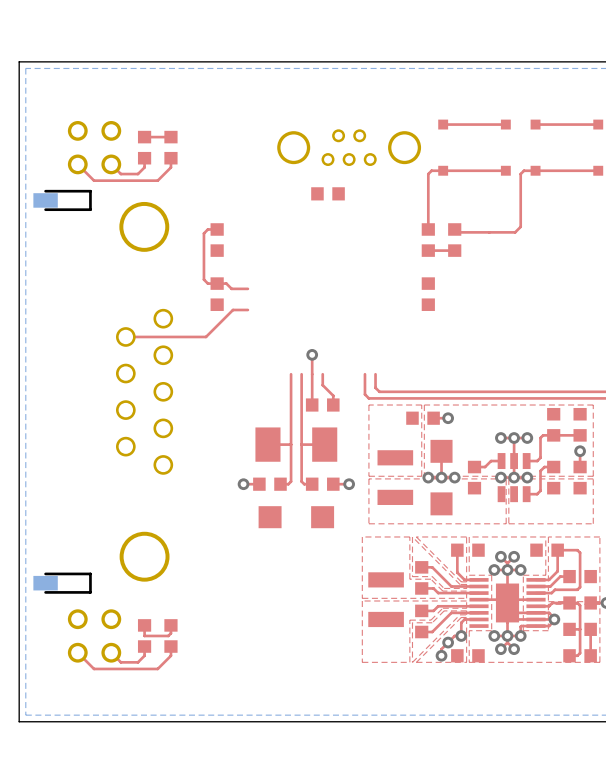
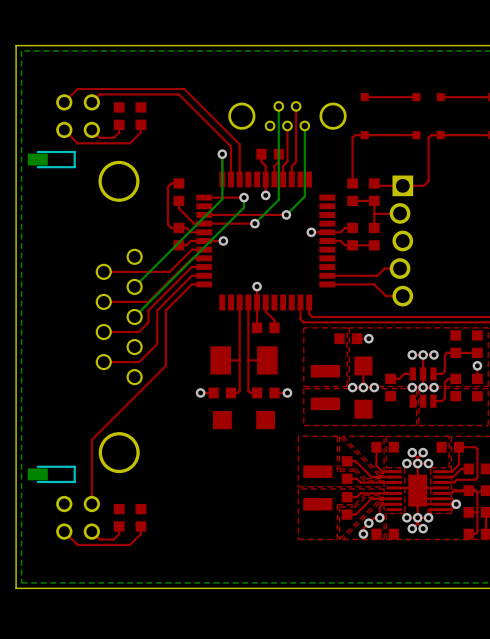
top track: none -> (64, 102) (77, 89) (184, 89) (239, 144) (239, 179)
top track: none -> (91, 102) (99, 94) (178, 94) (231, 146) (231, 179)
bottom track: none -> (278, 106) (278, 199) (254, 223)
top track: none -> (296, 106) (296, 161) (291, 166) (291, 179)
top track: (170, 137) (144, 137) -> none
top track: none -> (287, 125) (287, 161) (283, 166) (283, 179)
bottom track: none -> (304, 125) (304, 196) (286, 214)
bottom track: none -> (222, 154) (222, 199) (134, 286)
via: none -> (222, 154)
top track: none -> (261, 154) (261, 161) (265, 166) (265, 195)
top track: none -> (278, 154) (278, 161) (274, 166) (274, 179)
via: none -> (265, 195)
top track: none -> (244, 197) (204, 197)
bottom track: none -> (244, 197) (244, 207) (134, 316)
via: none -> (244, 197)
top track: none -> (178, 200) (178, 208) (194, 223) (254, 223)
top track: none -> (374, 200) (374, 227)
top track: none -> (400, 213) (374, 213)
top track: none -> (286, 214) (204, 214)
via: none -> (286, 214)
via: none -> (254, 223)
top track: none -> (352, 227) (344, 227) (340, 232) (311, 232)
via: none -> (311, 232)
part: none -> (374, 236)
top track: none -> (223, 240) (190, 240) (186, 245) (178, 245)
via: none -> (223, 240)
part: none -> (265, 240)
top track: none -> (327, 240) (340, 240) (344, 245) (374, 245)
part: none -> (401, 240)
top track: none -> (204, 258) (191, 258) (148, 301) (103, 301)
top track: none -> (204, 267) (191, 267) (148, 310) (148, 322) (138, 332) (103, 332)
top track: none -> (400, 268) (384, 268) (377, 275) (327, 275)
top track: none -> (204, 275) (191, 275) (157, 310) (157, 344) (139, 362) (103, 362)
top track: none -> (204, 284) (191, 284) (165, 310) (165, 365) (91, 439) (91, 504)
top track: none -> (327, 284) (374, 284) (386, 296) (402, 296)
top track: (170, 625) (170, 633) (168, 635) (144, 635) (144, 625) -> none

